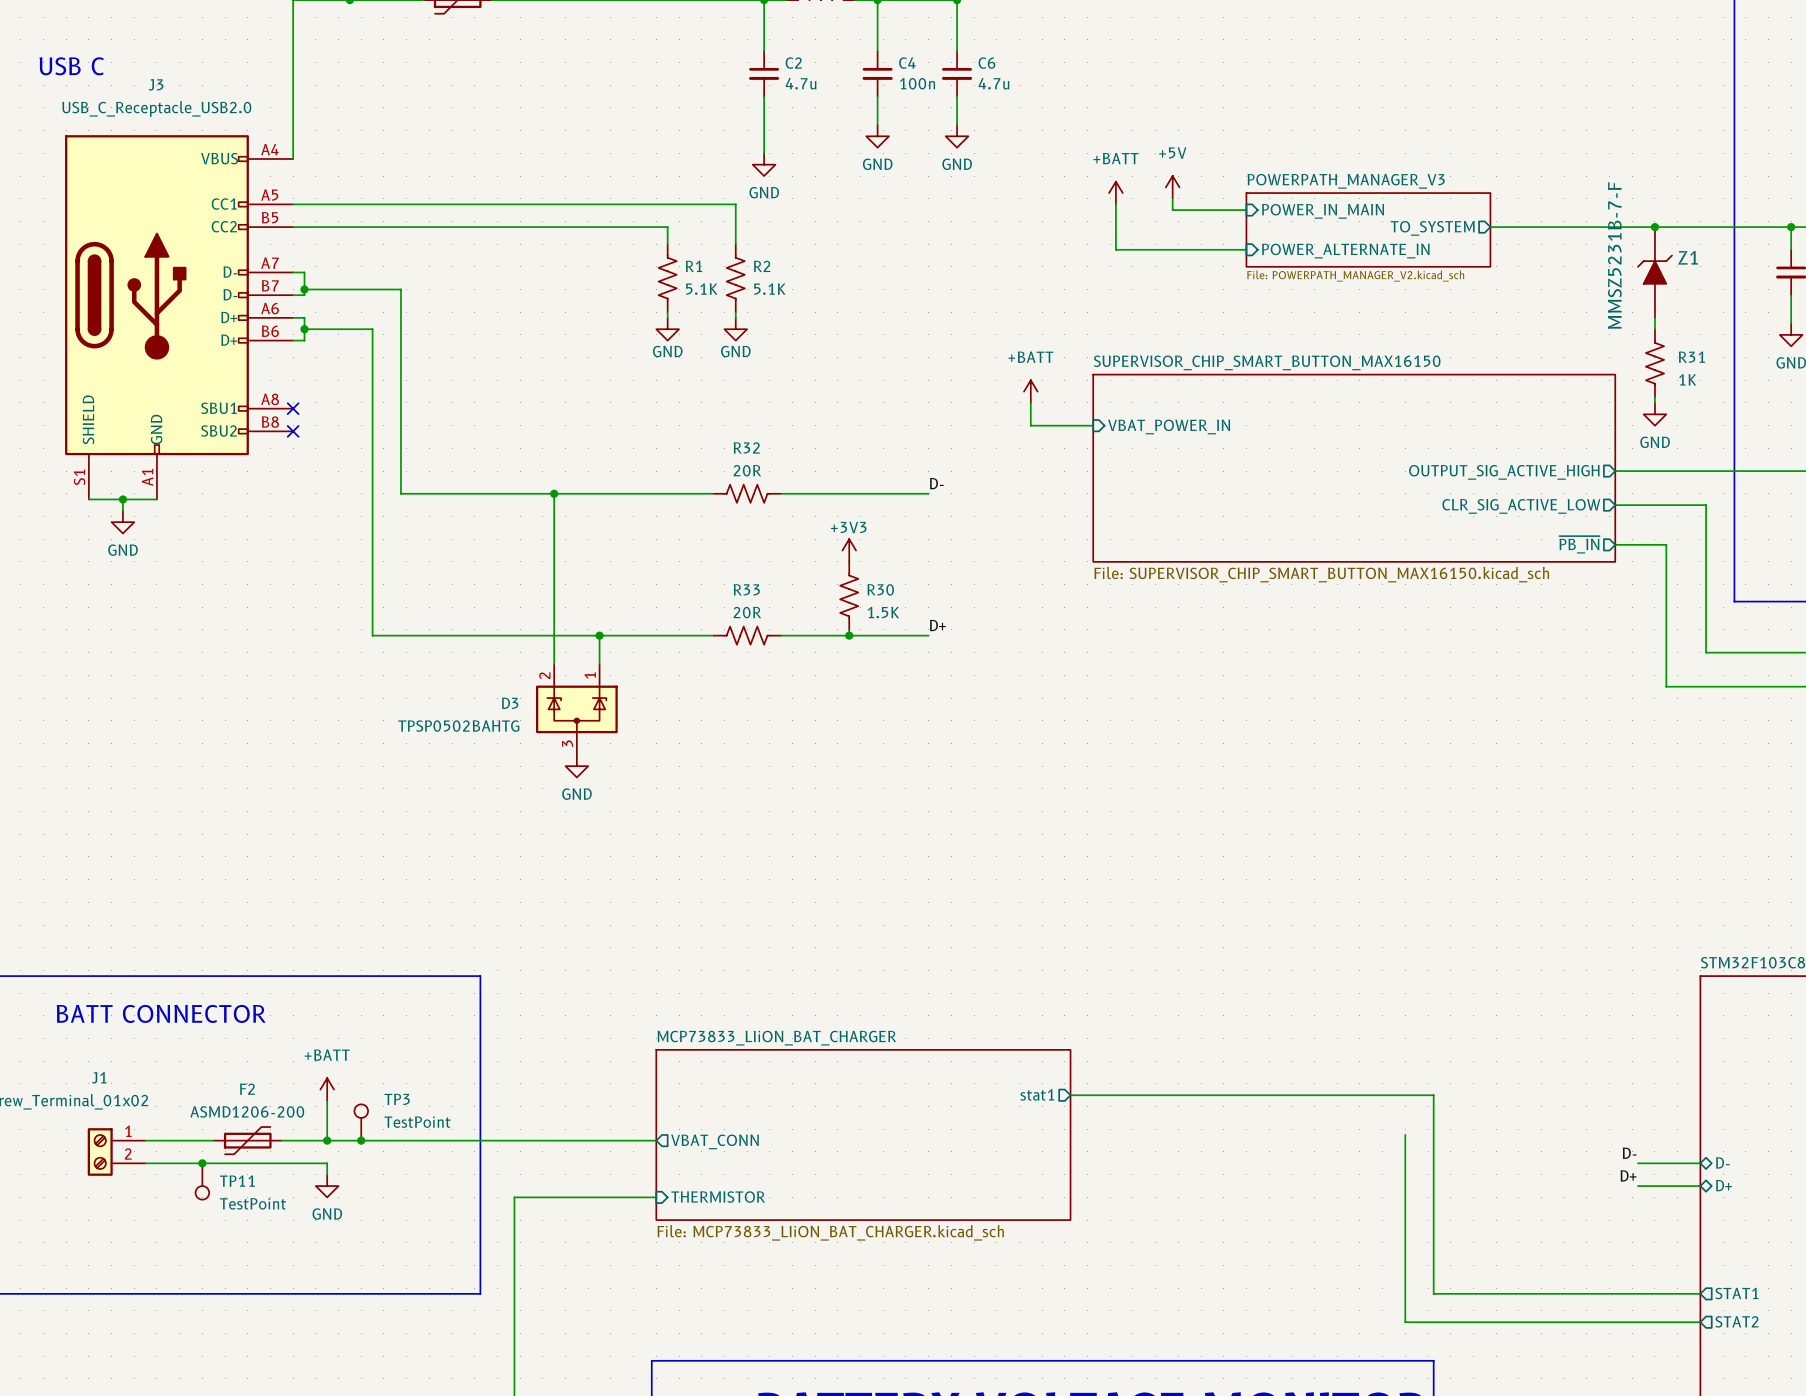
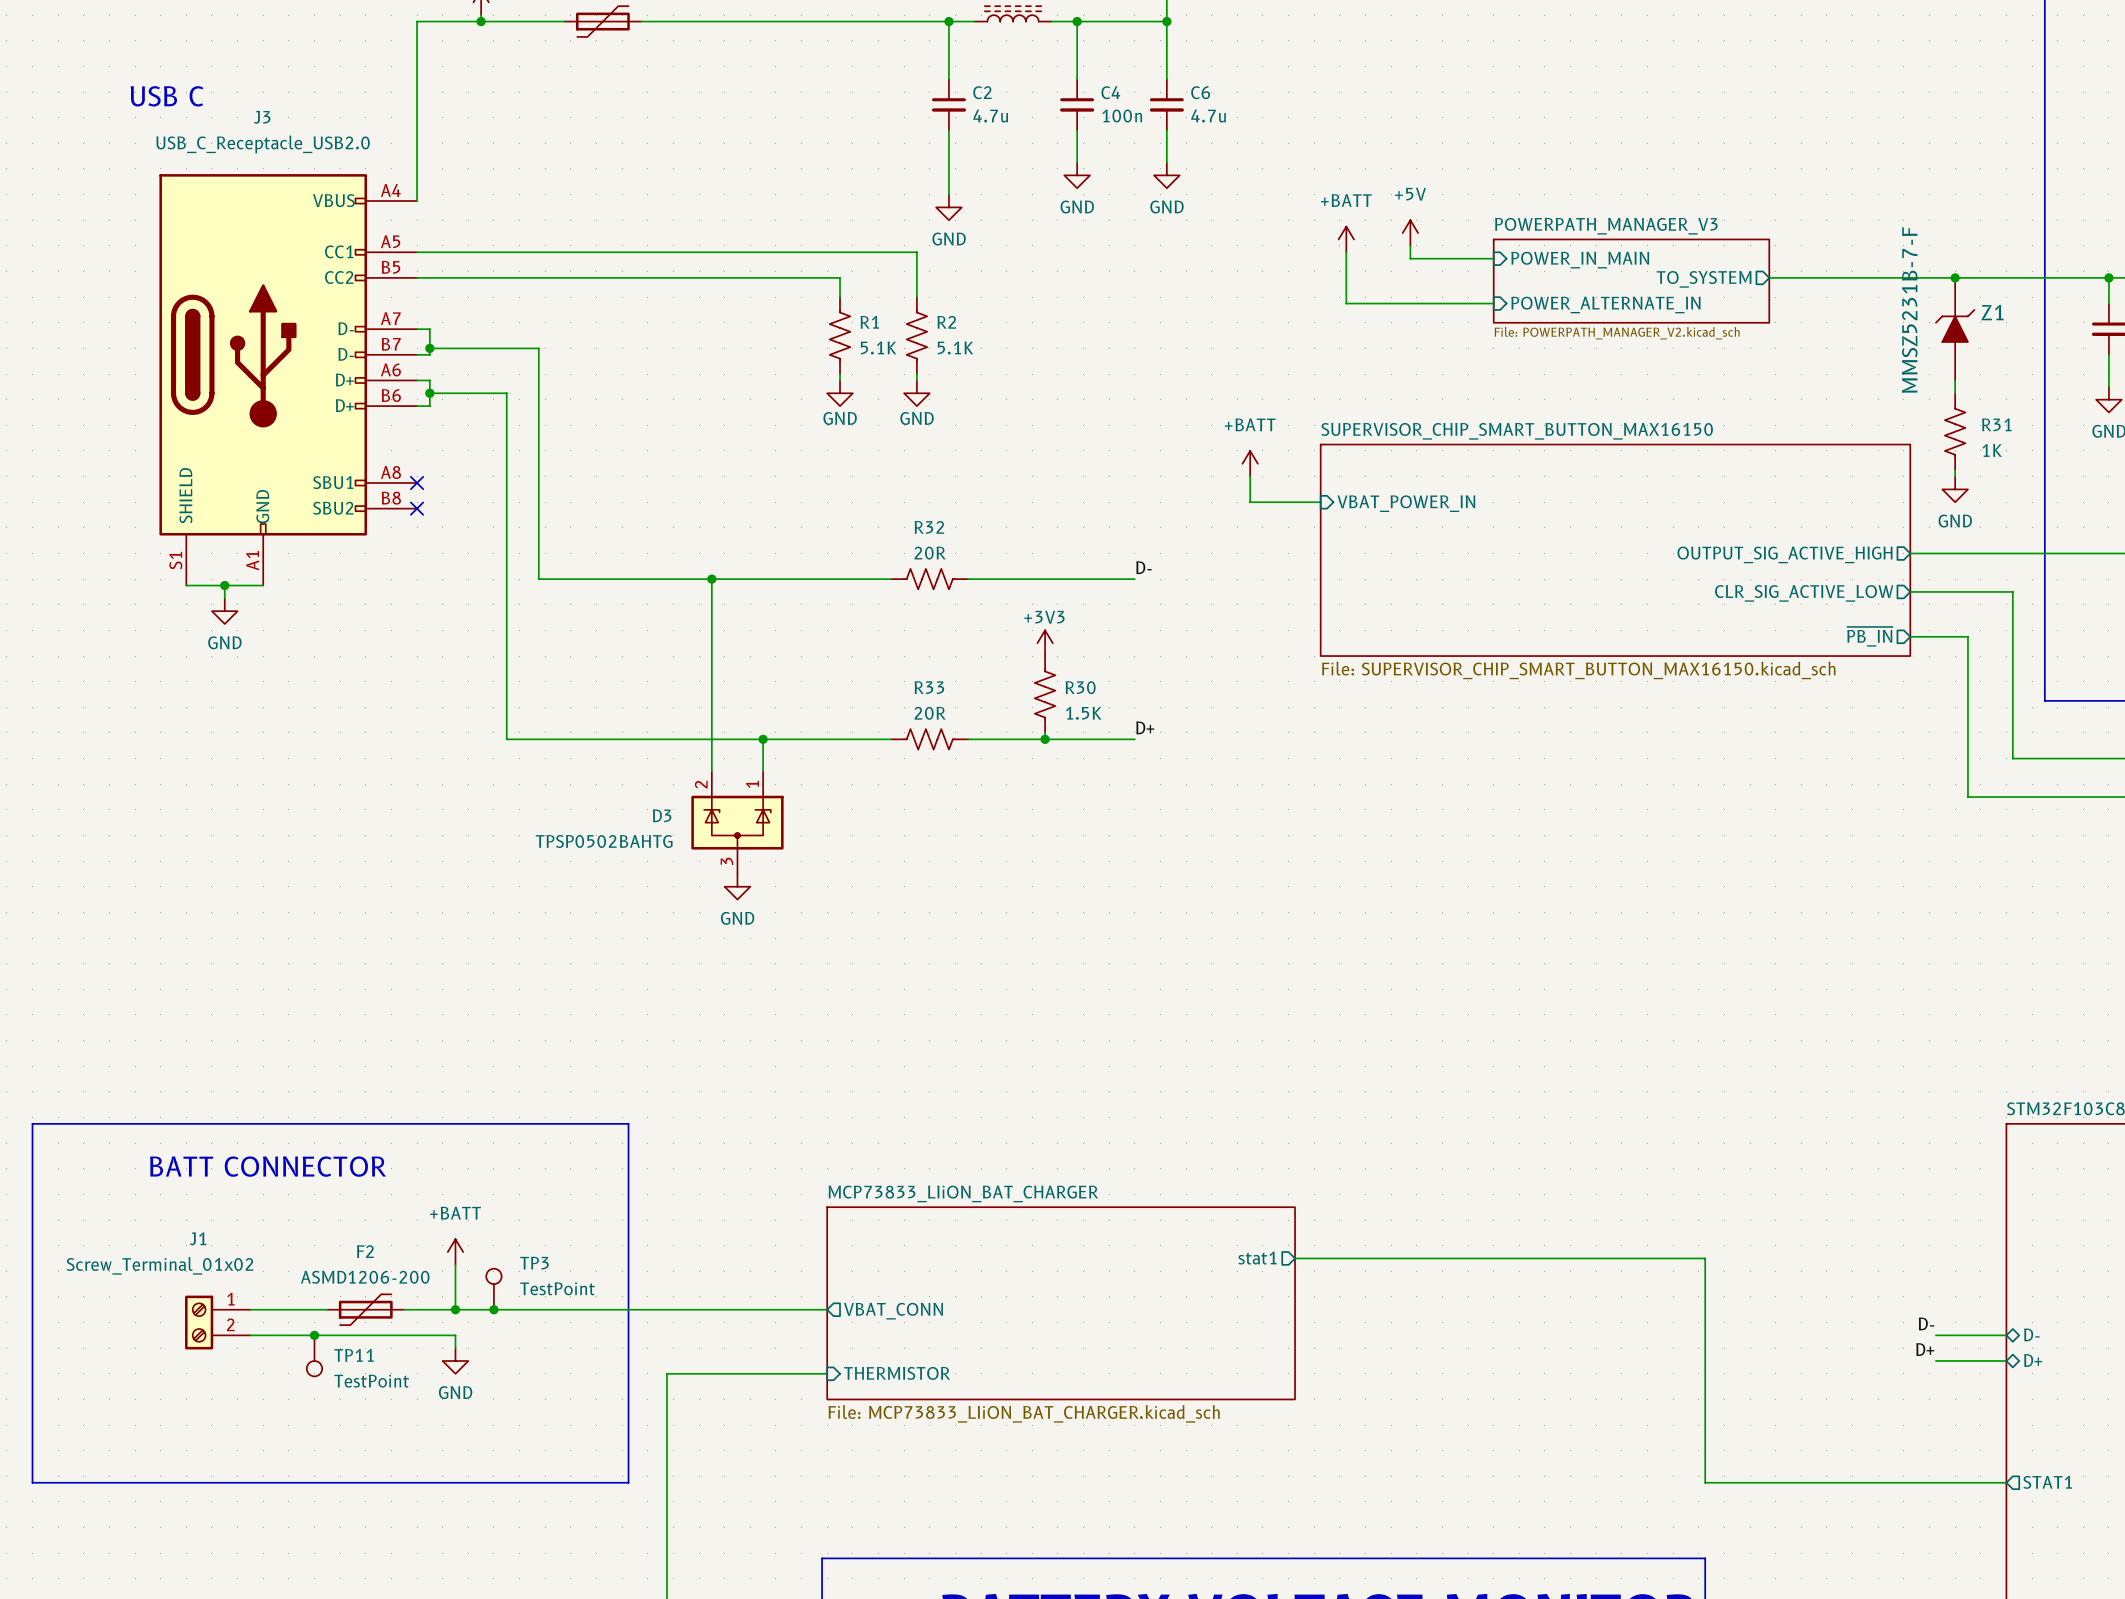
wire: (1405, 1134) (1405, 1322) (1700, 1322) -> none
sheet pin: STAT2 (1736, 1321) -> none

